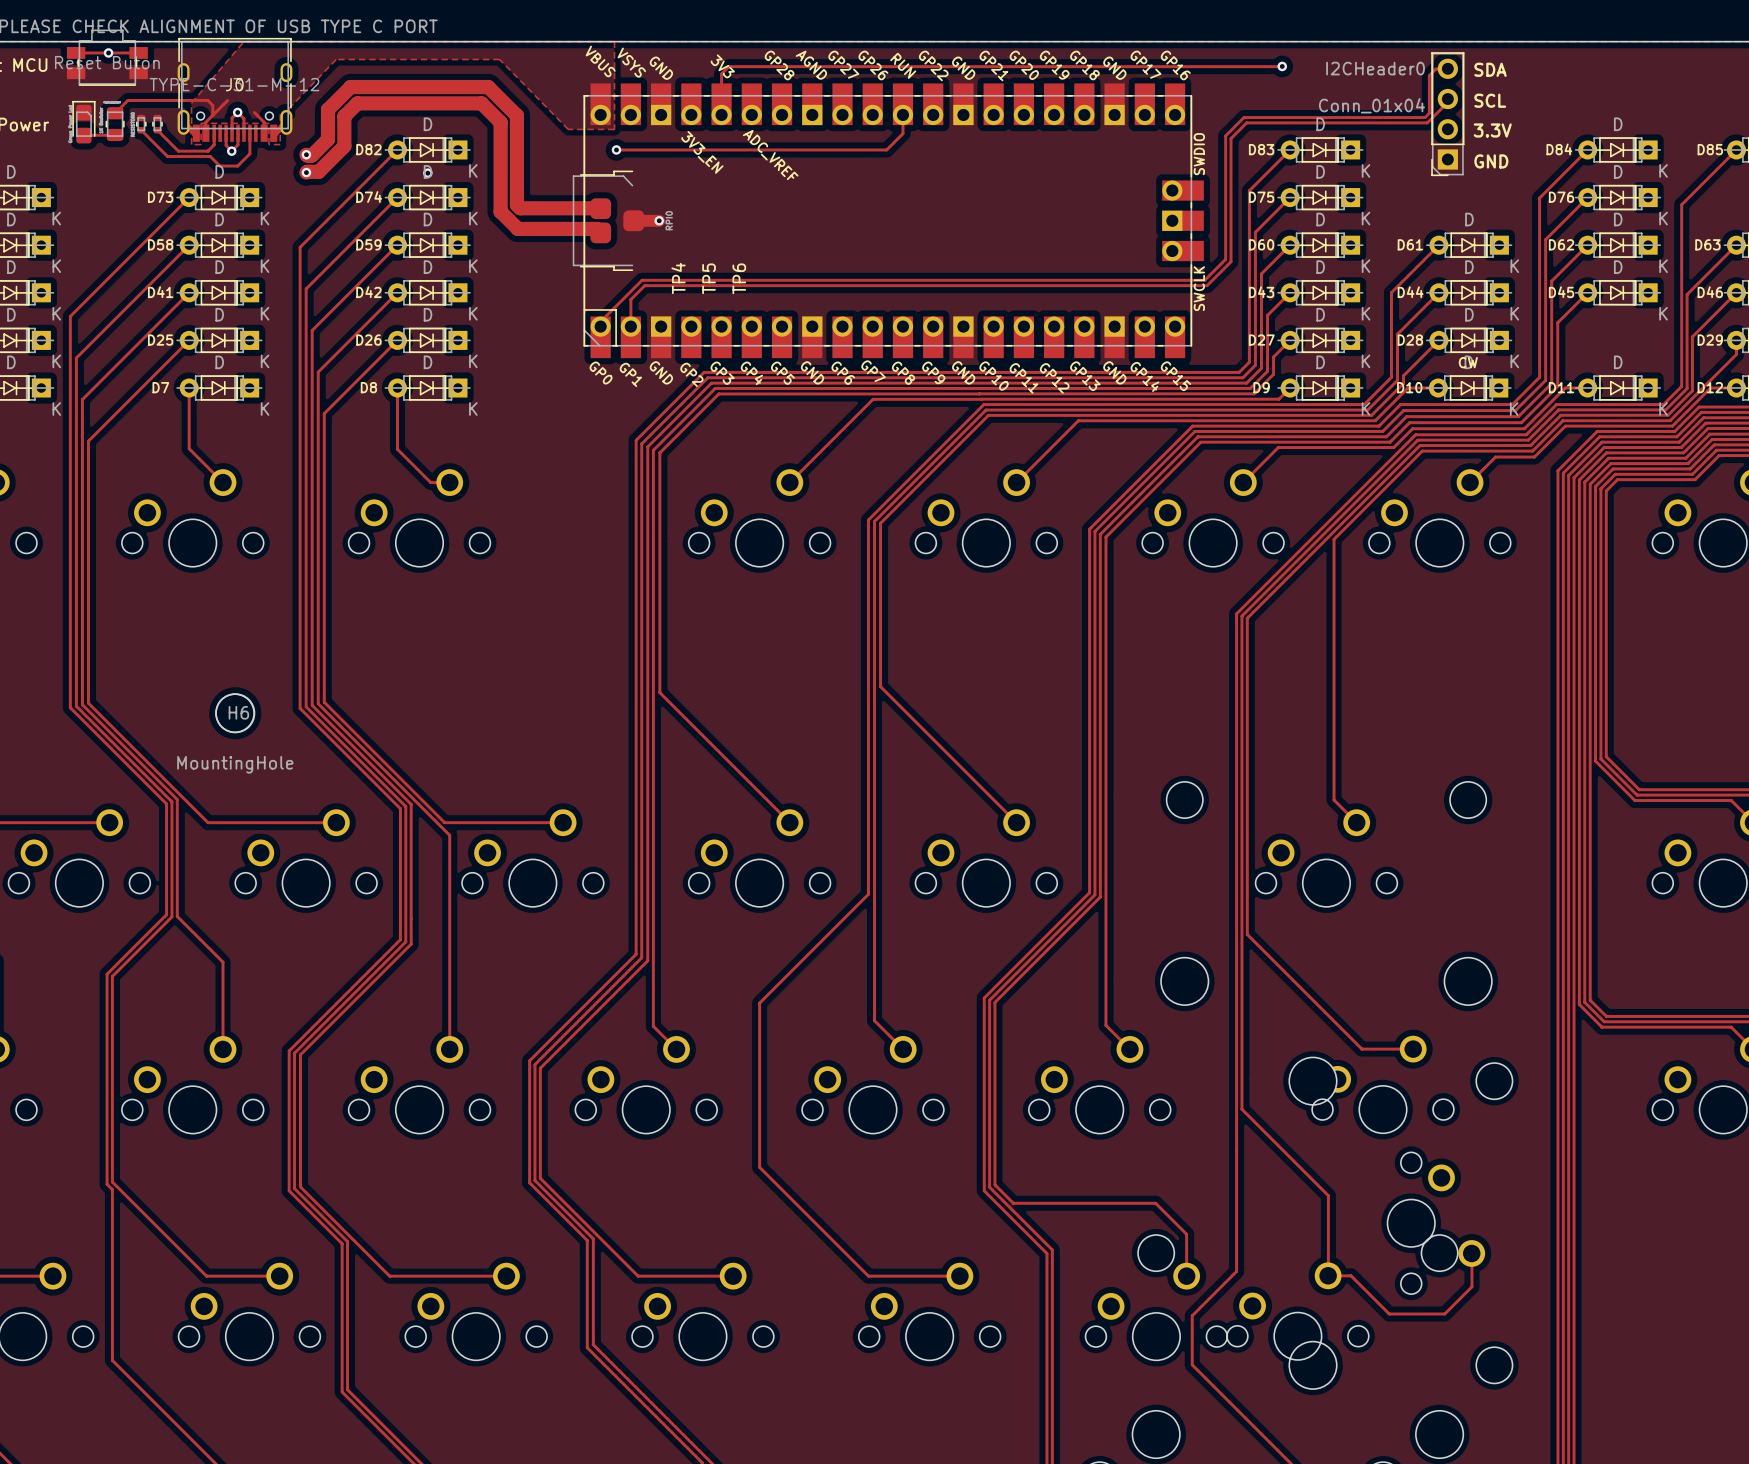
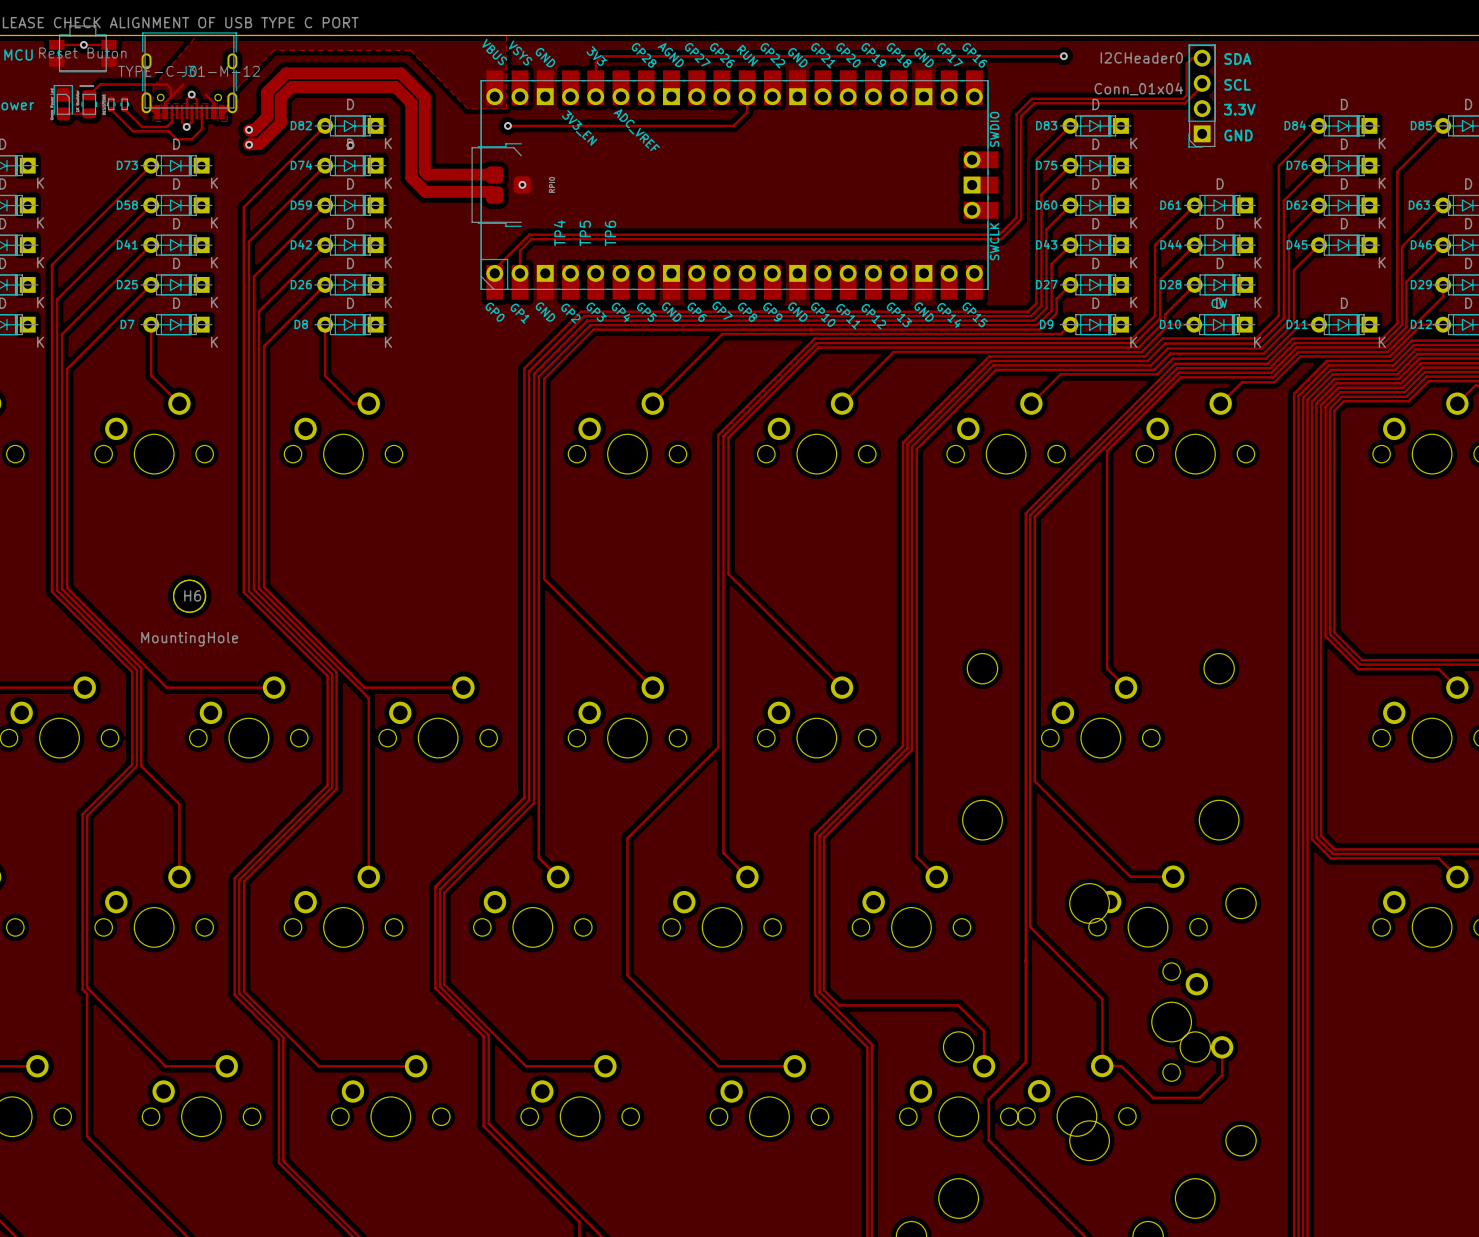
track: (633, 220) (659, 220) -> none
via position: (659, 220) -> (522, 184)

